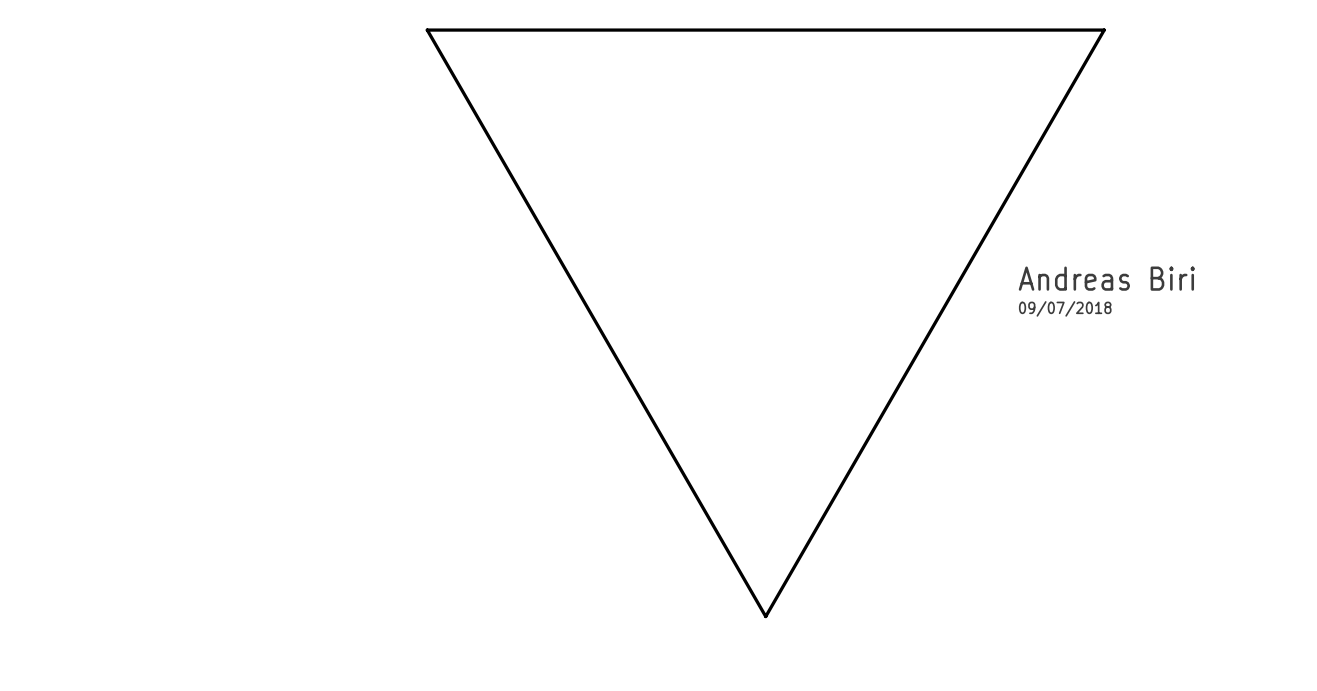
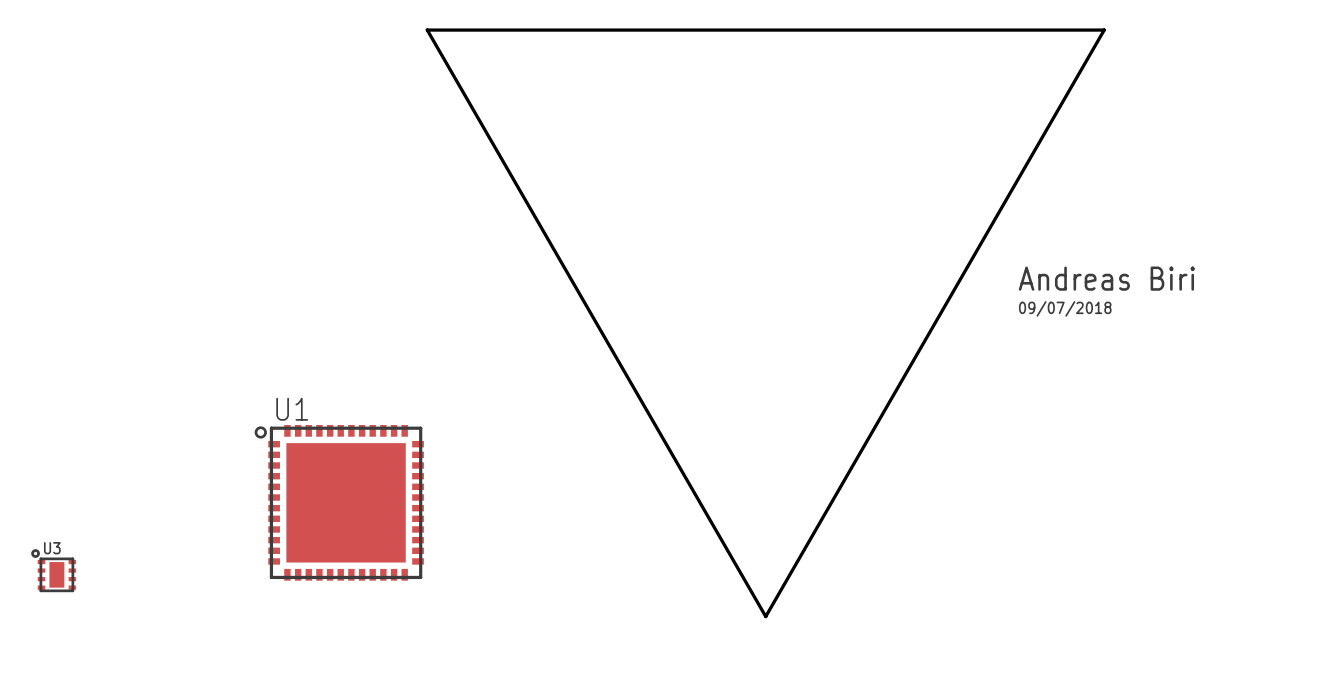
U1: none -> (339, 502)
U3: none -> (53, 570)

